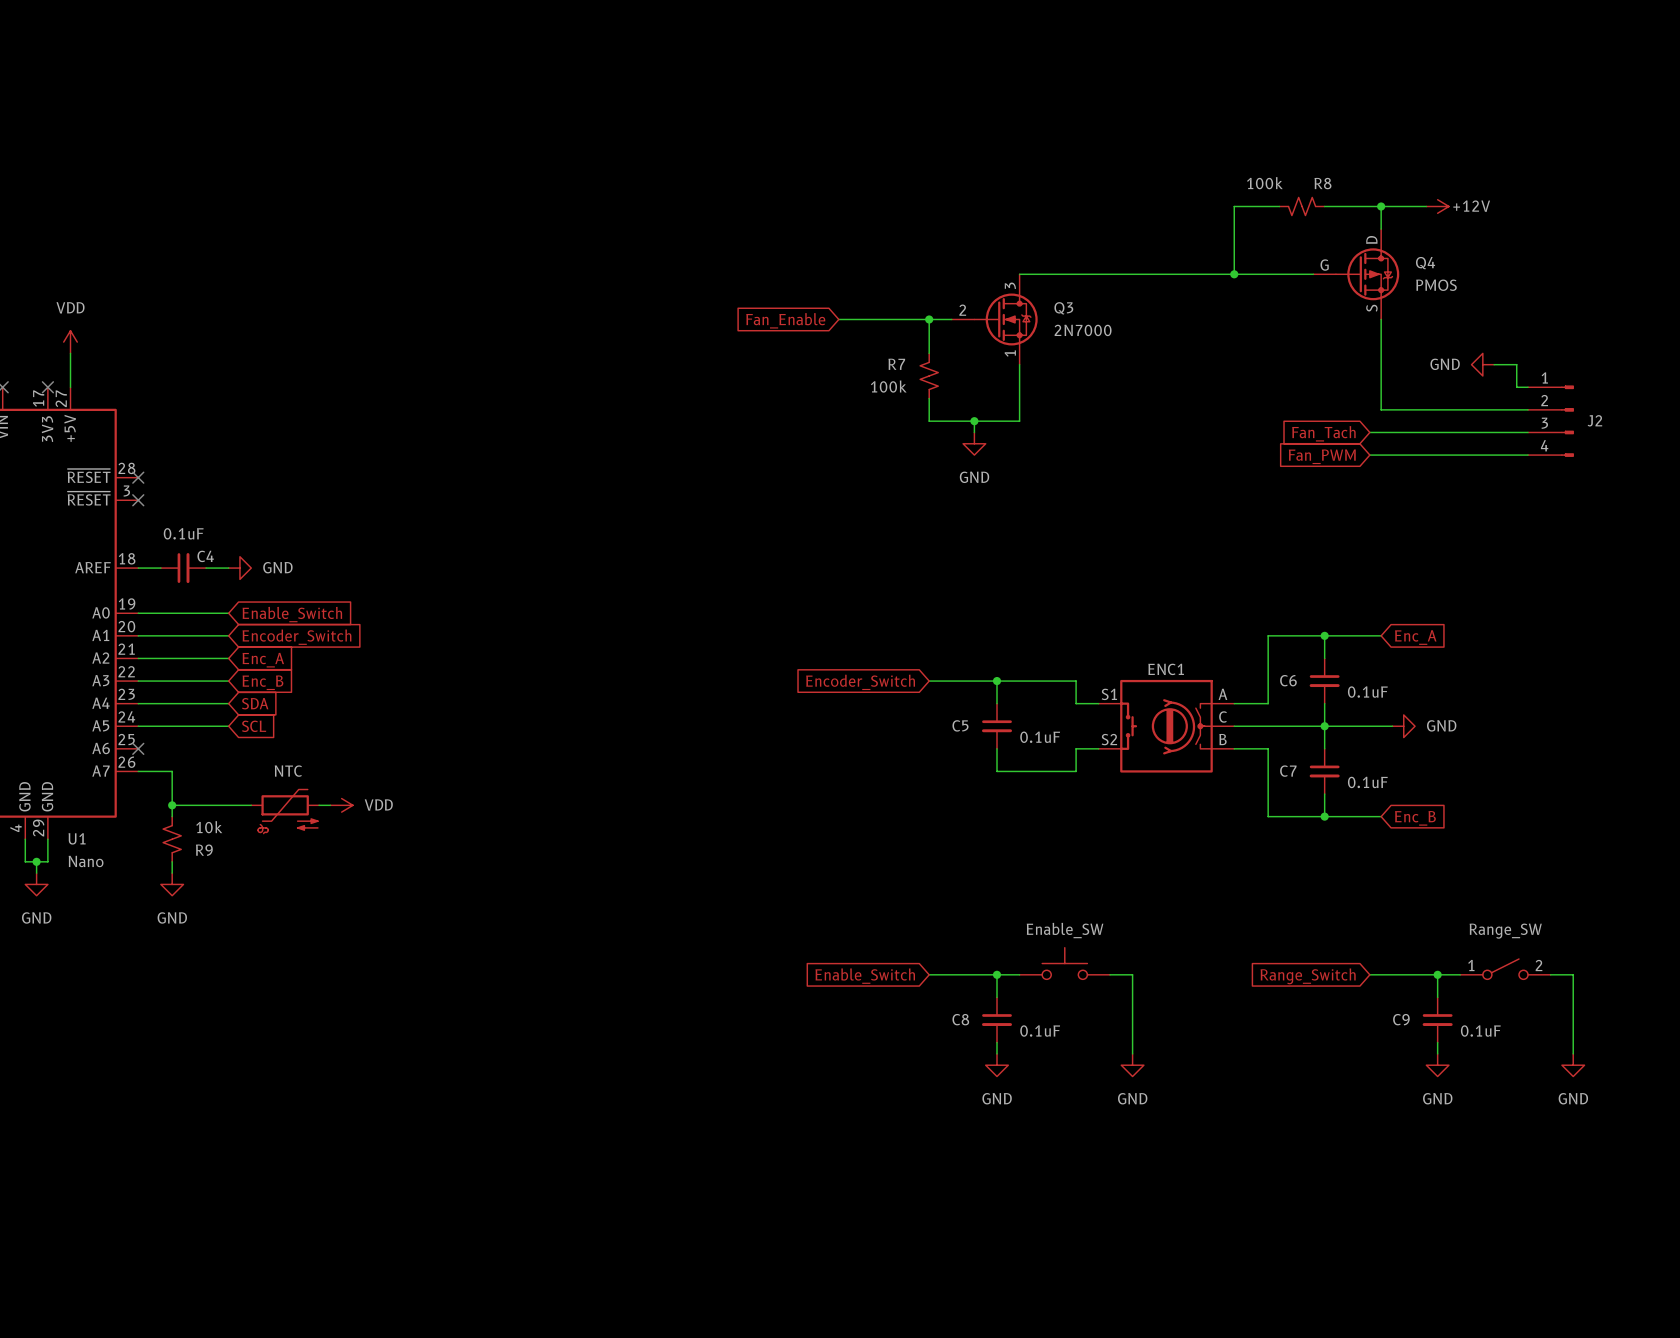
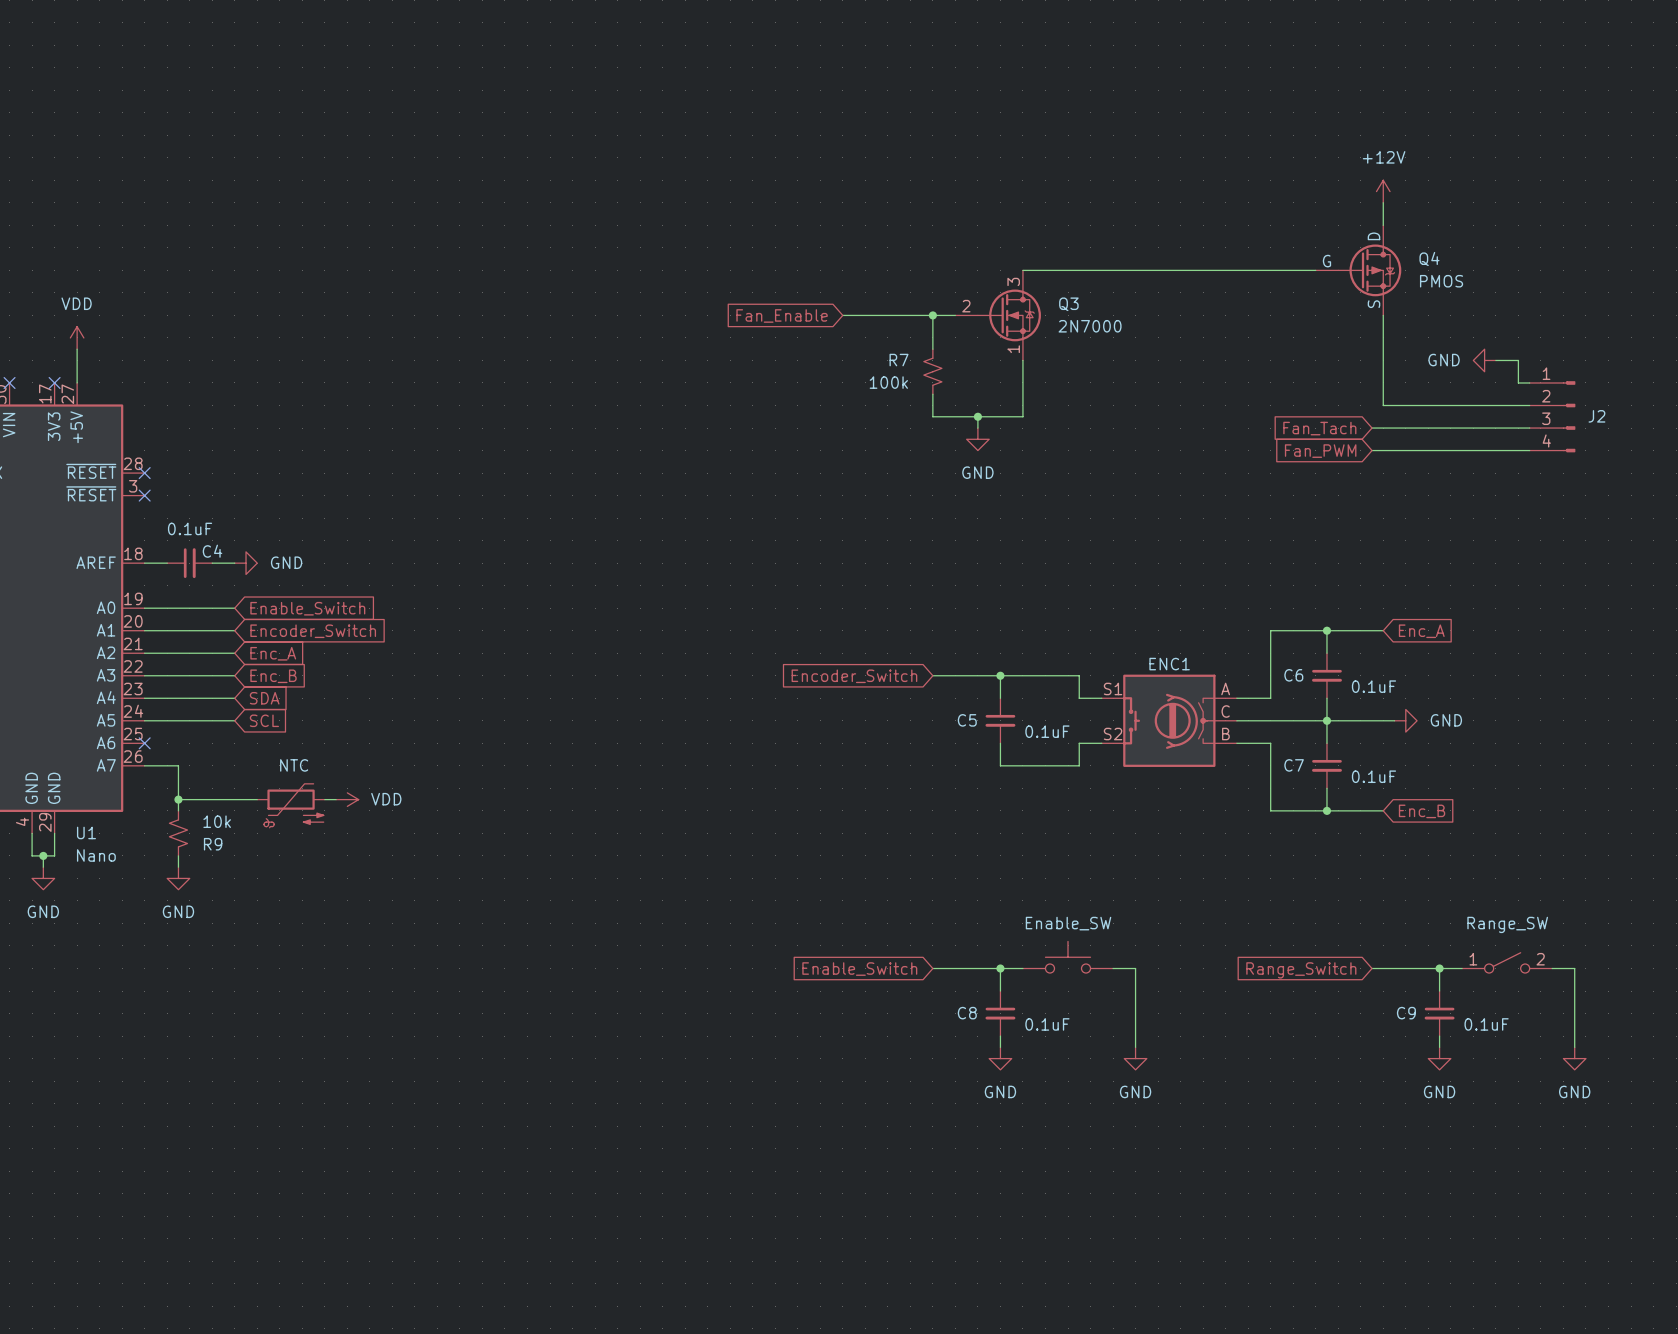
wire: (1279, 206) (1234, 206) (1234, 274) -> none
R8: 100k (1302, 206) -> none
wire: (1324, 206) (1426, 206) -> none
junction: (1381, 206) -> none
power symbol rotation: 0° (1437, 206) -> 90° counterclockwise (1383, 191)
power symbol position: +12V (1437, 206) -> +12V (1383, 191)
junction: (1234, 274) -> none

